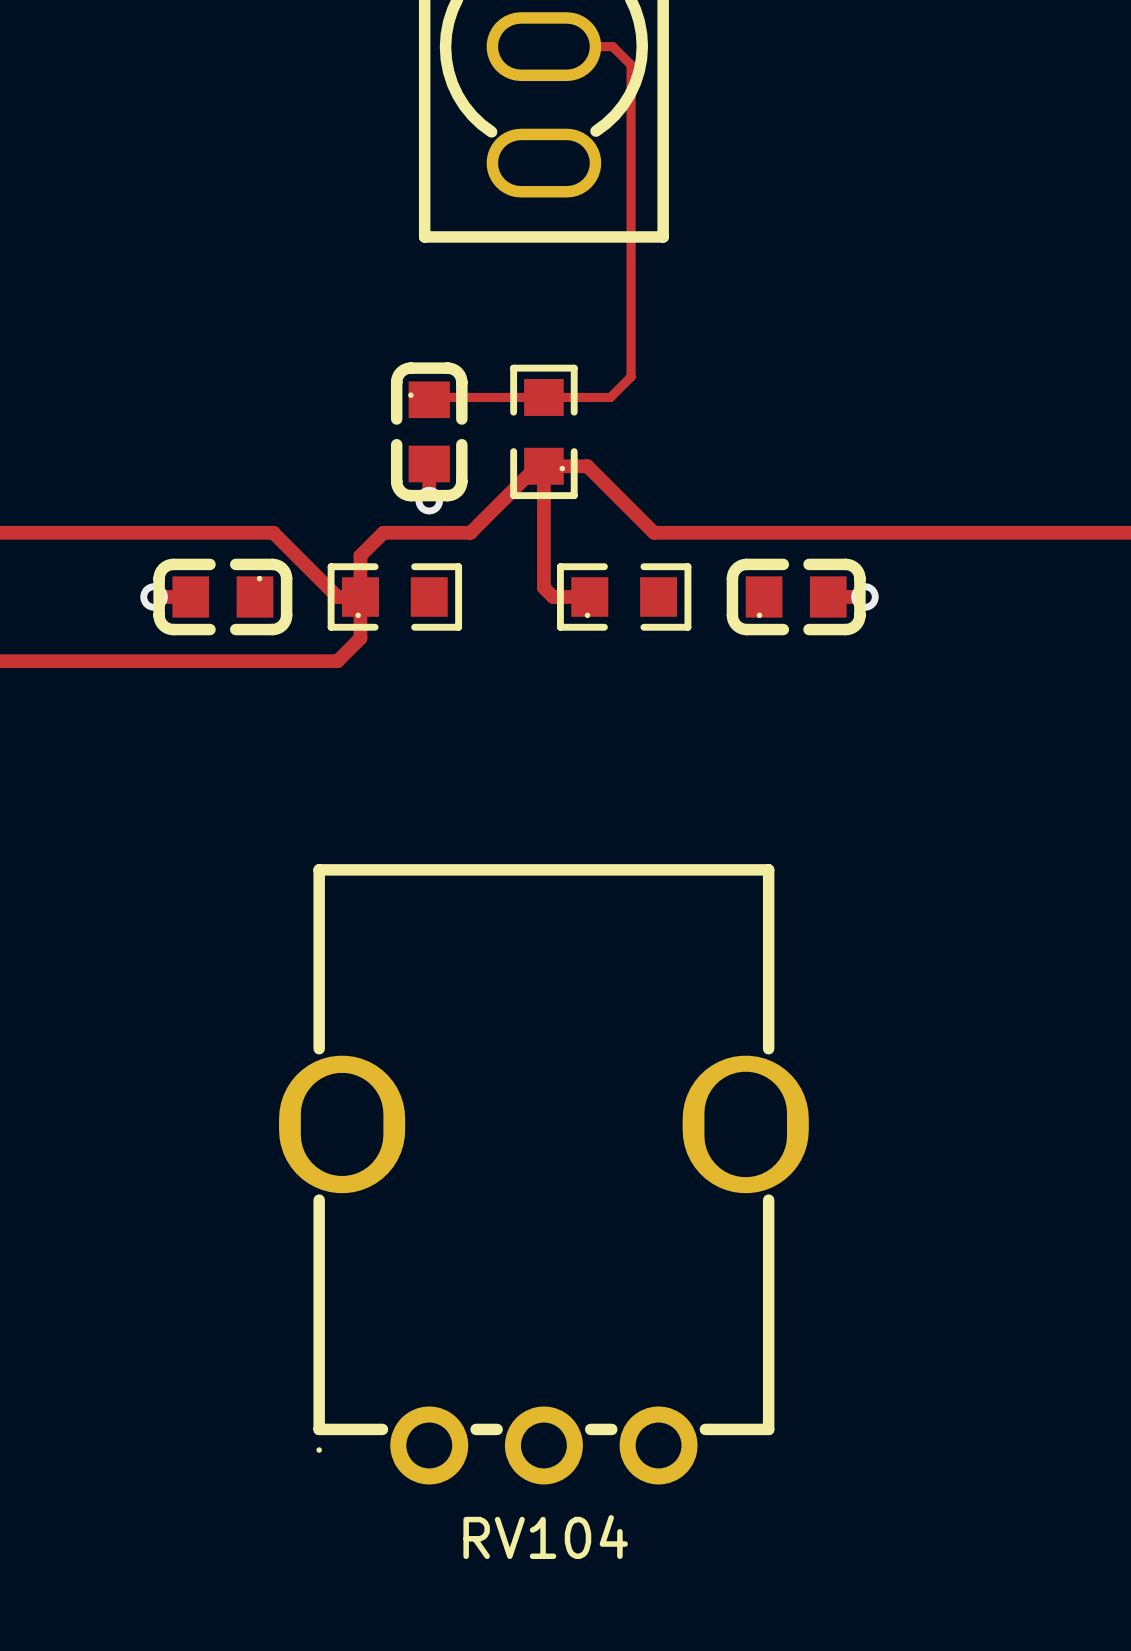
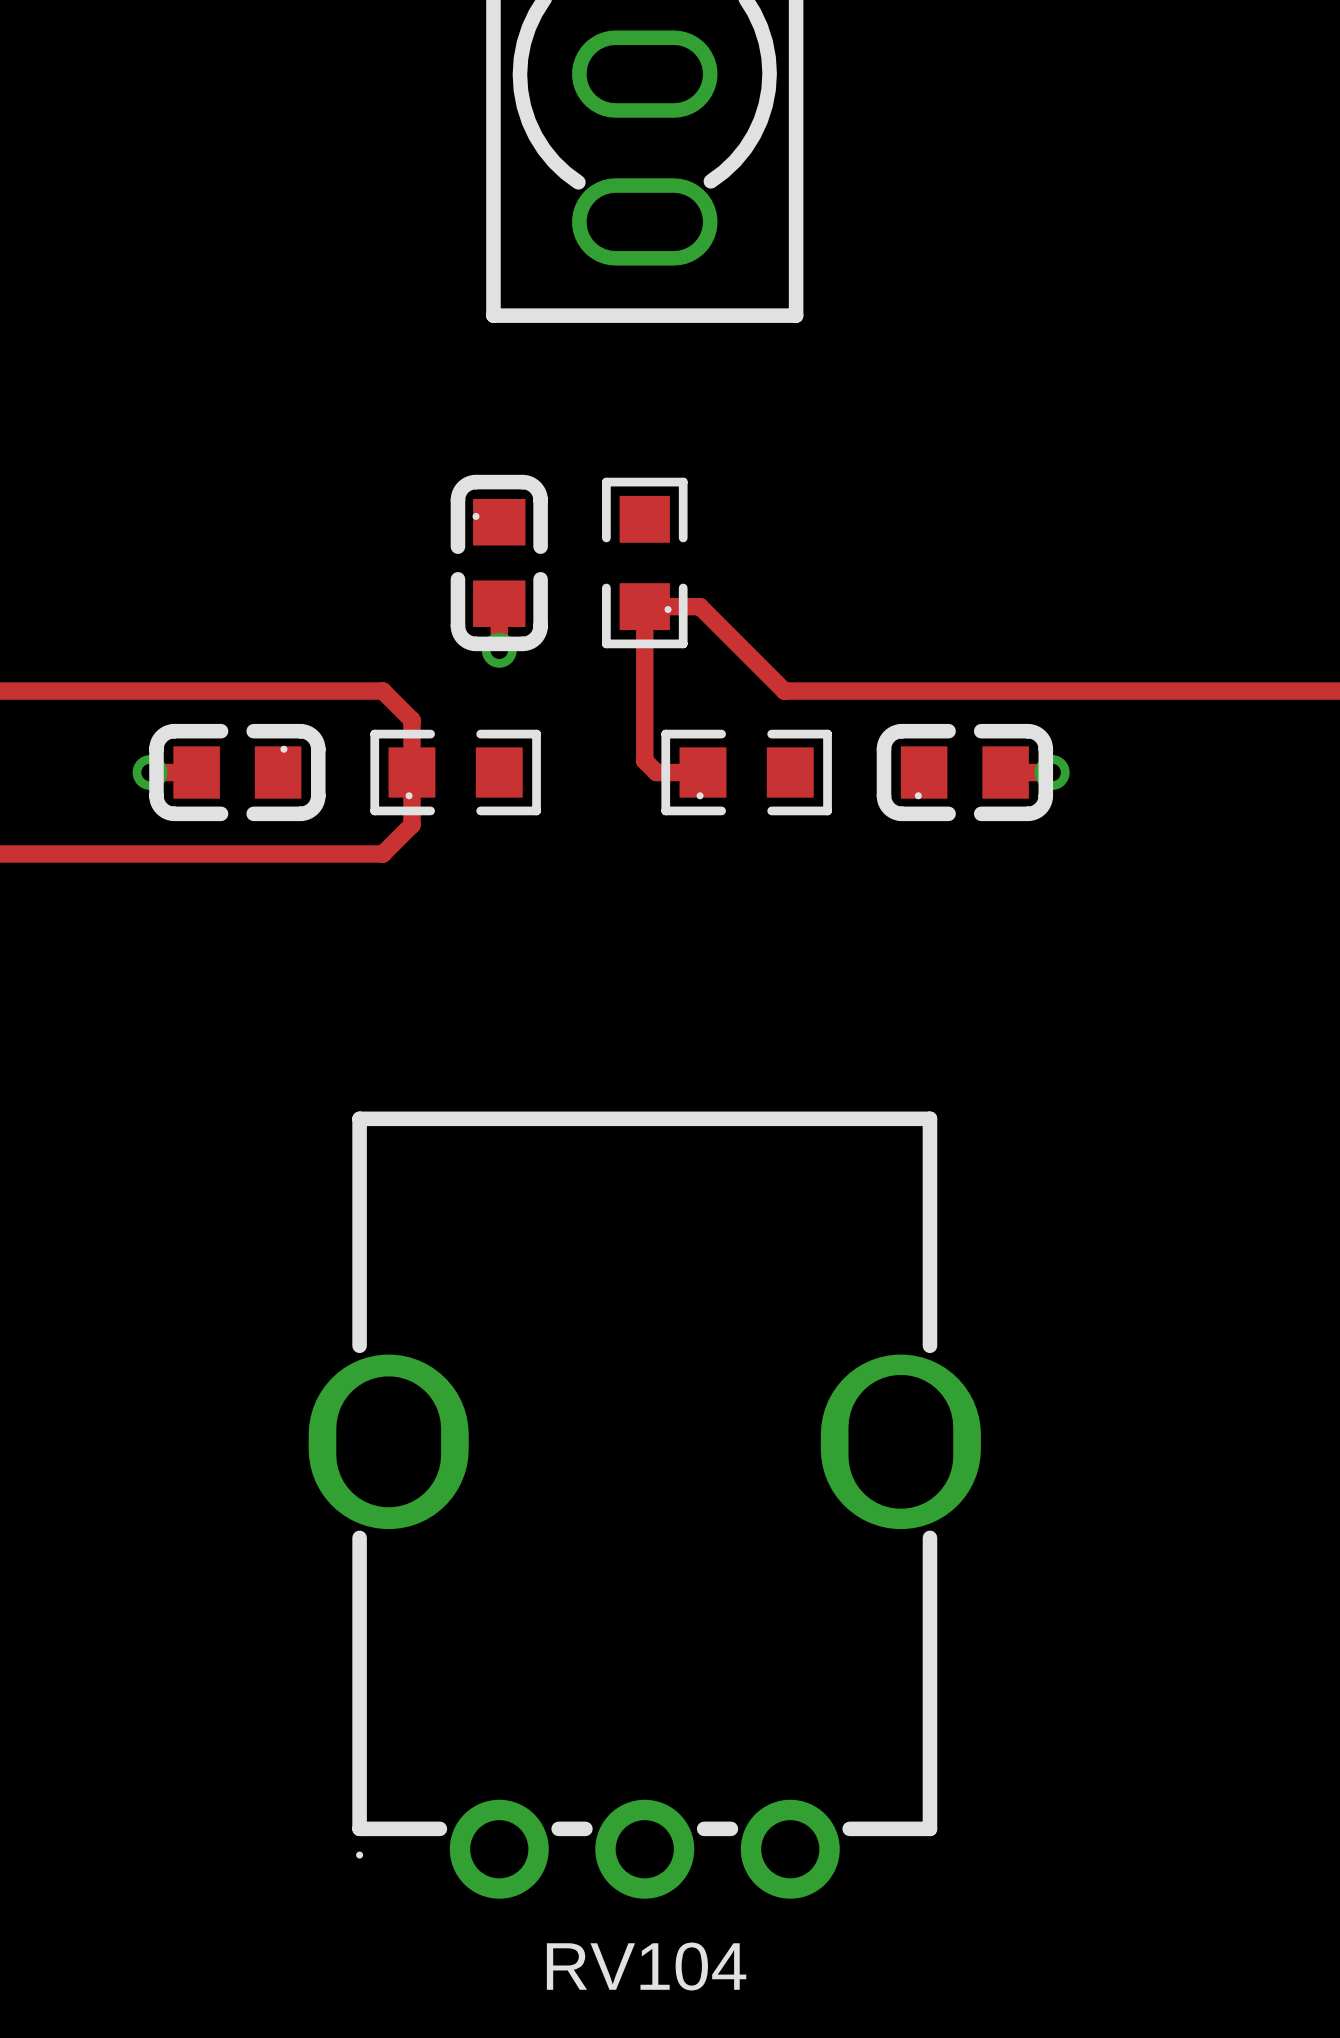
track: (543, 46) (612, 46) (631, 64) (631, 376) (610, 397) (431, 397) (429, 399) -> none
track: (543, 466) (537, 466) (470, 532) (383, 532) (360, 555) -> none
track: (273, 532) (337, 596) (360, 596) -> (301, 691) (382, 691) (411, 720)

